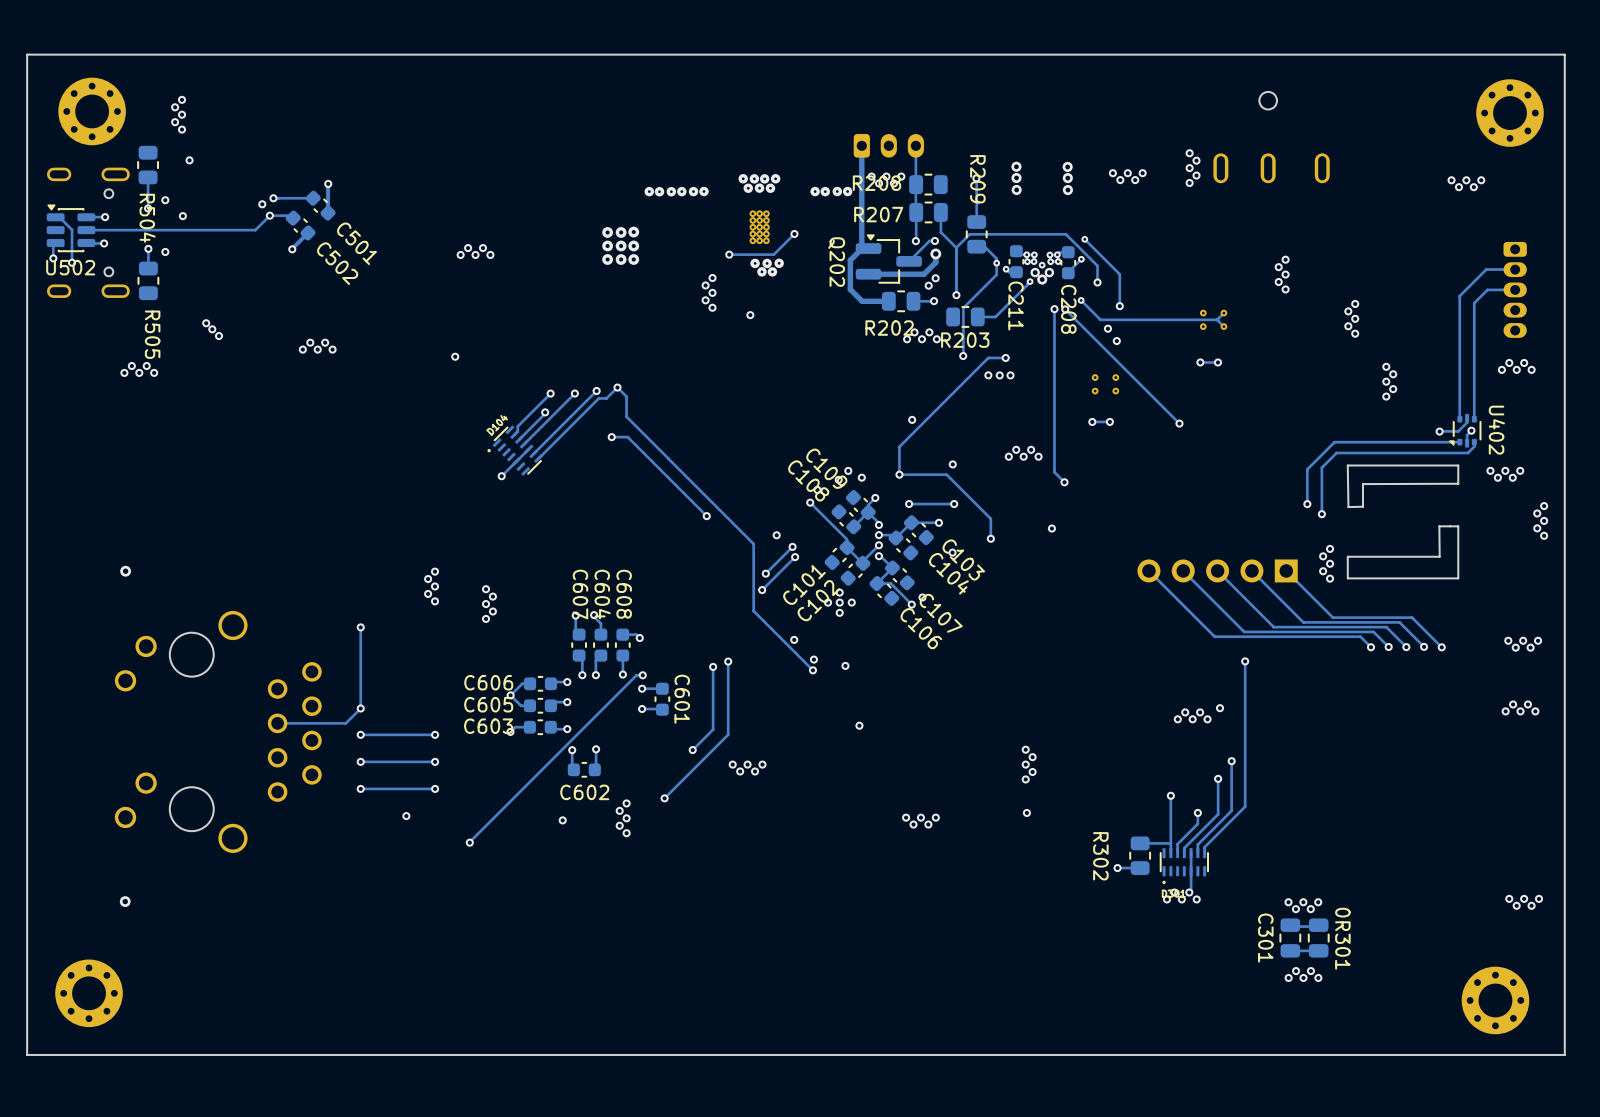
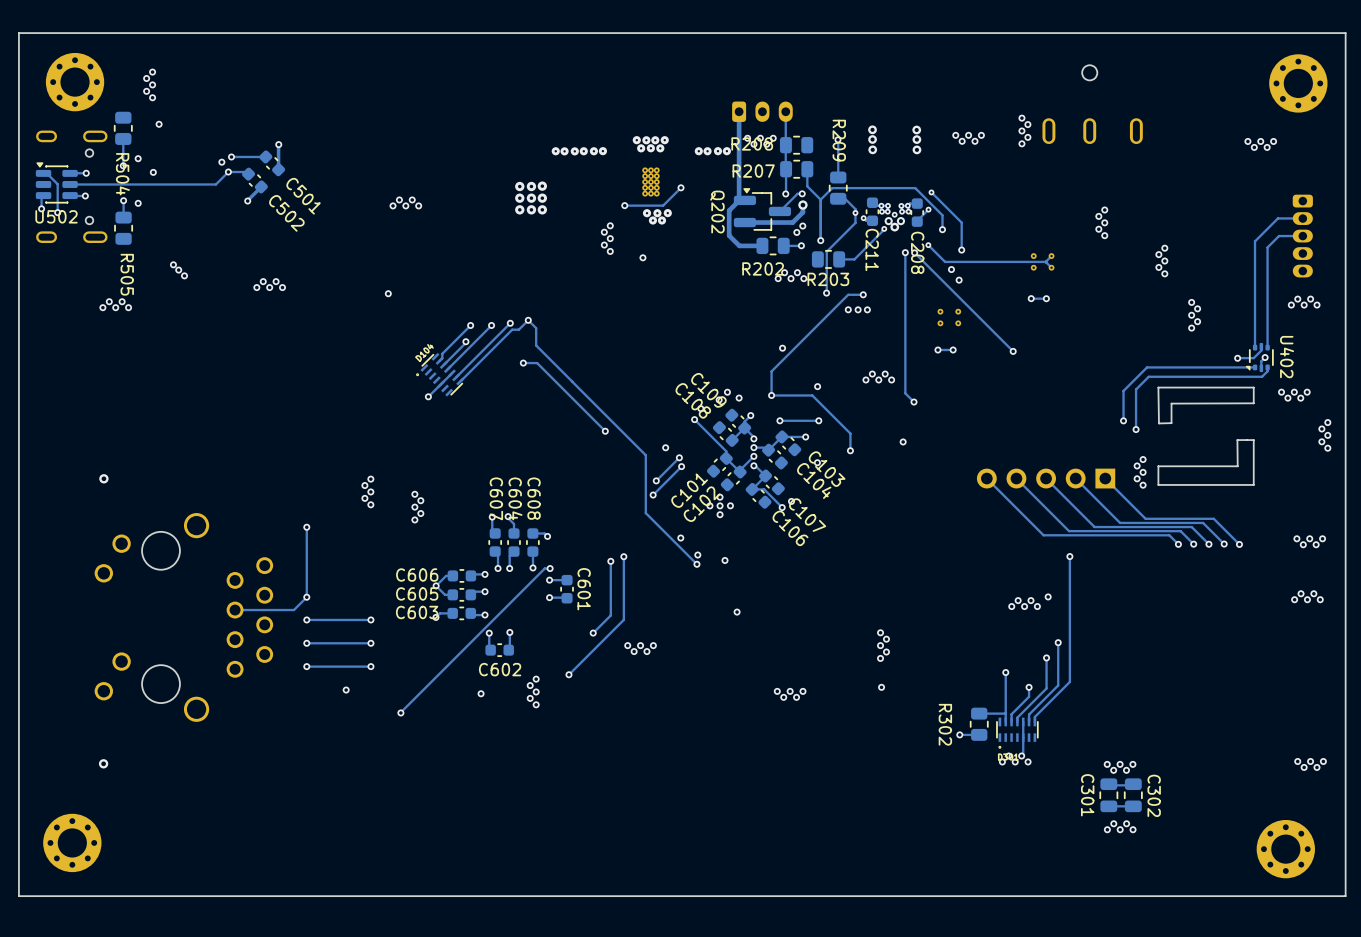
0R301 name: 0R301 (1342, 938) -> C302 (1154, 795)

